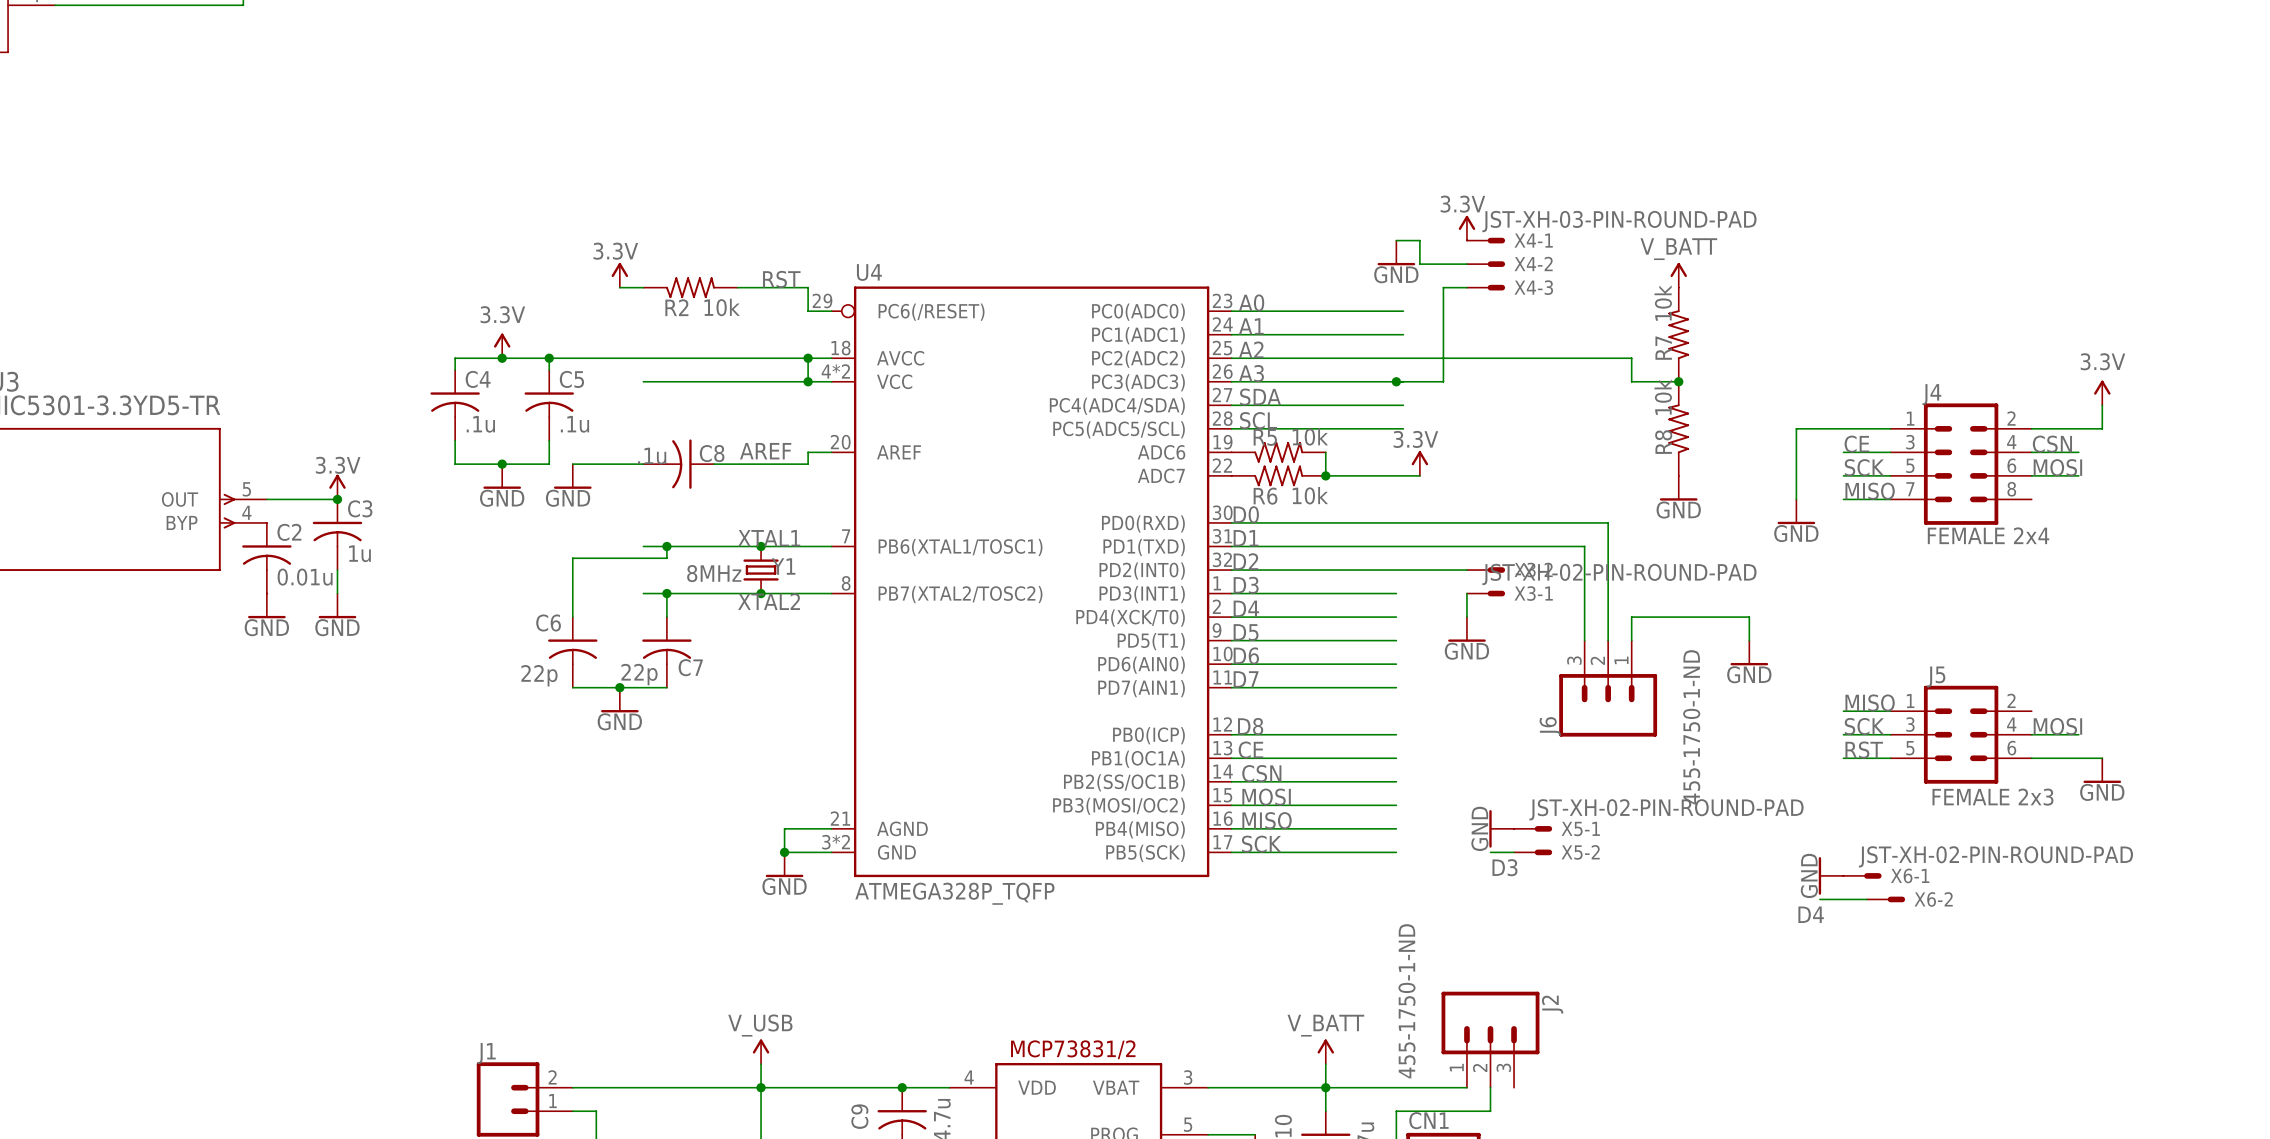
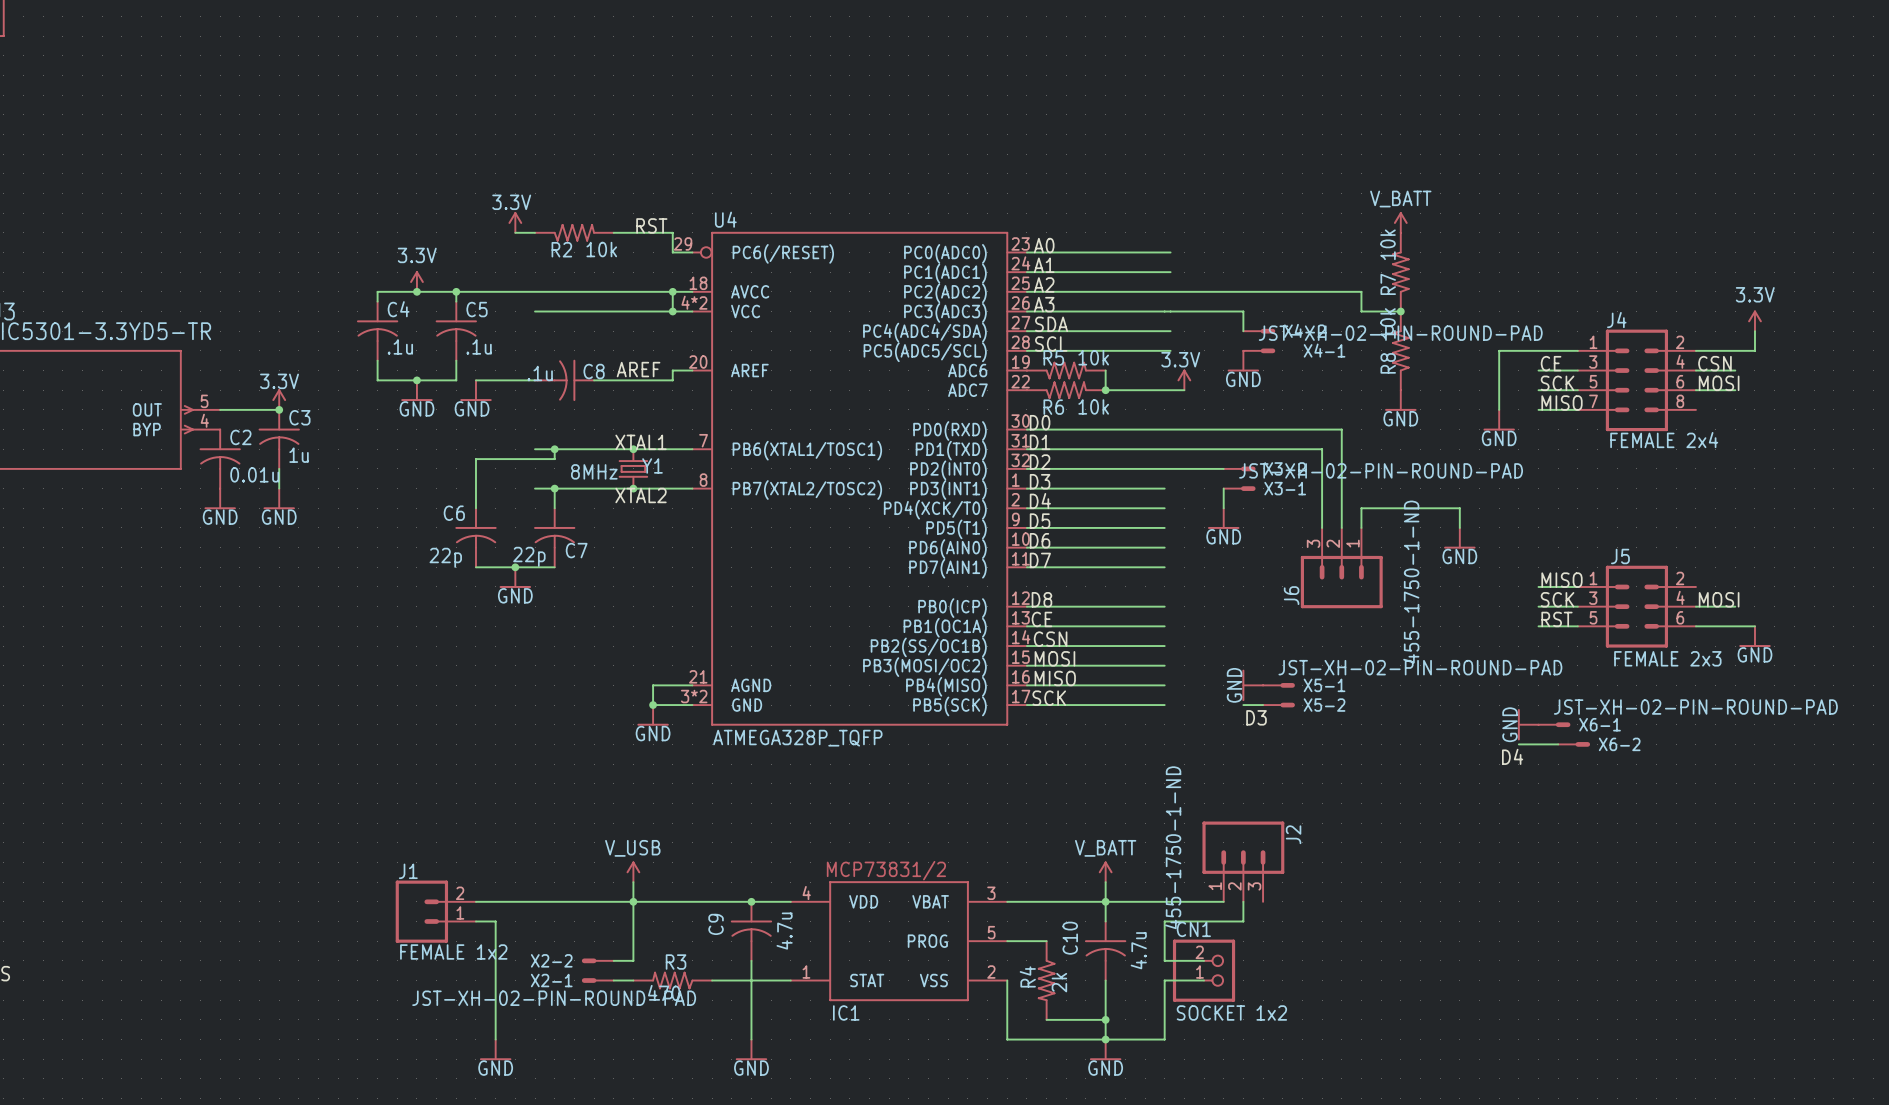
X4-1 value: JST-XH-03-PIN-ROUND-PAD (1619, 221) -> JST-XH-02-PIN-ROUND-PAD (1400, 333)
power symbol: 3.3V (1466, 228) -> none
wire: (1396, 240) (1419, 240) (1419, 264) (1466, 264) -> none
X4-1 position: (1486, 240) -> (1259, 350)
X4-1 name position: X4-1 (1533, 240) -> X4-1 (1324, 350)
power symbol position: GND (1396, 252) -> GND (1243, 361)
X4-2 position: (1486, 264) -> (1259, 331)
wire: (1466, 287) (1443, 287) (1443, 381) -> (1243, 331) (1243, 311) (1204, 311)
X4-3: (1486, 287) -> none
junction: (1396, 381) -> none

